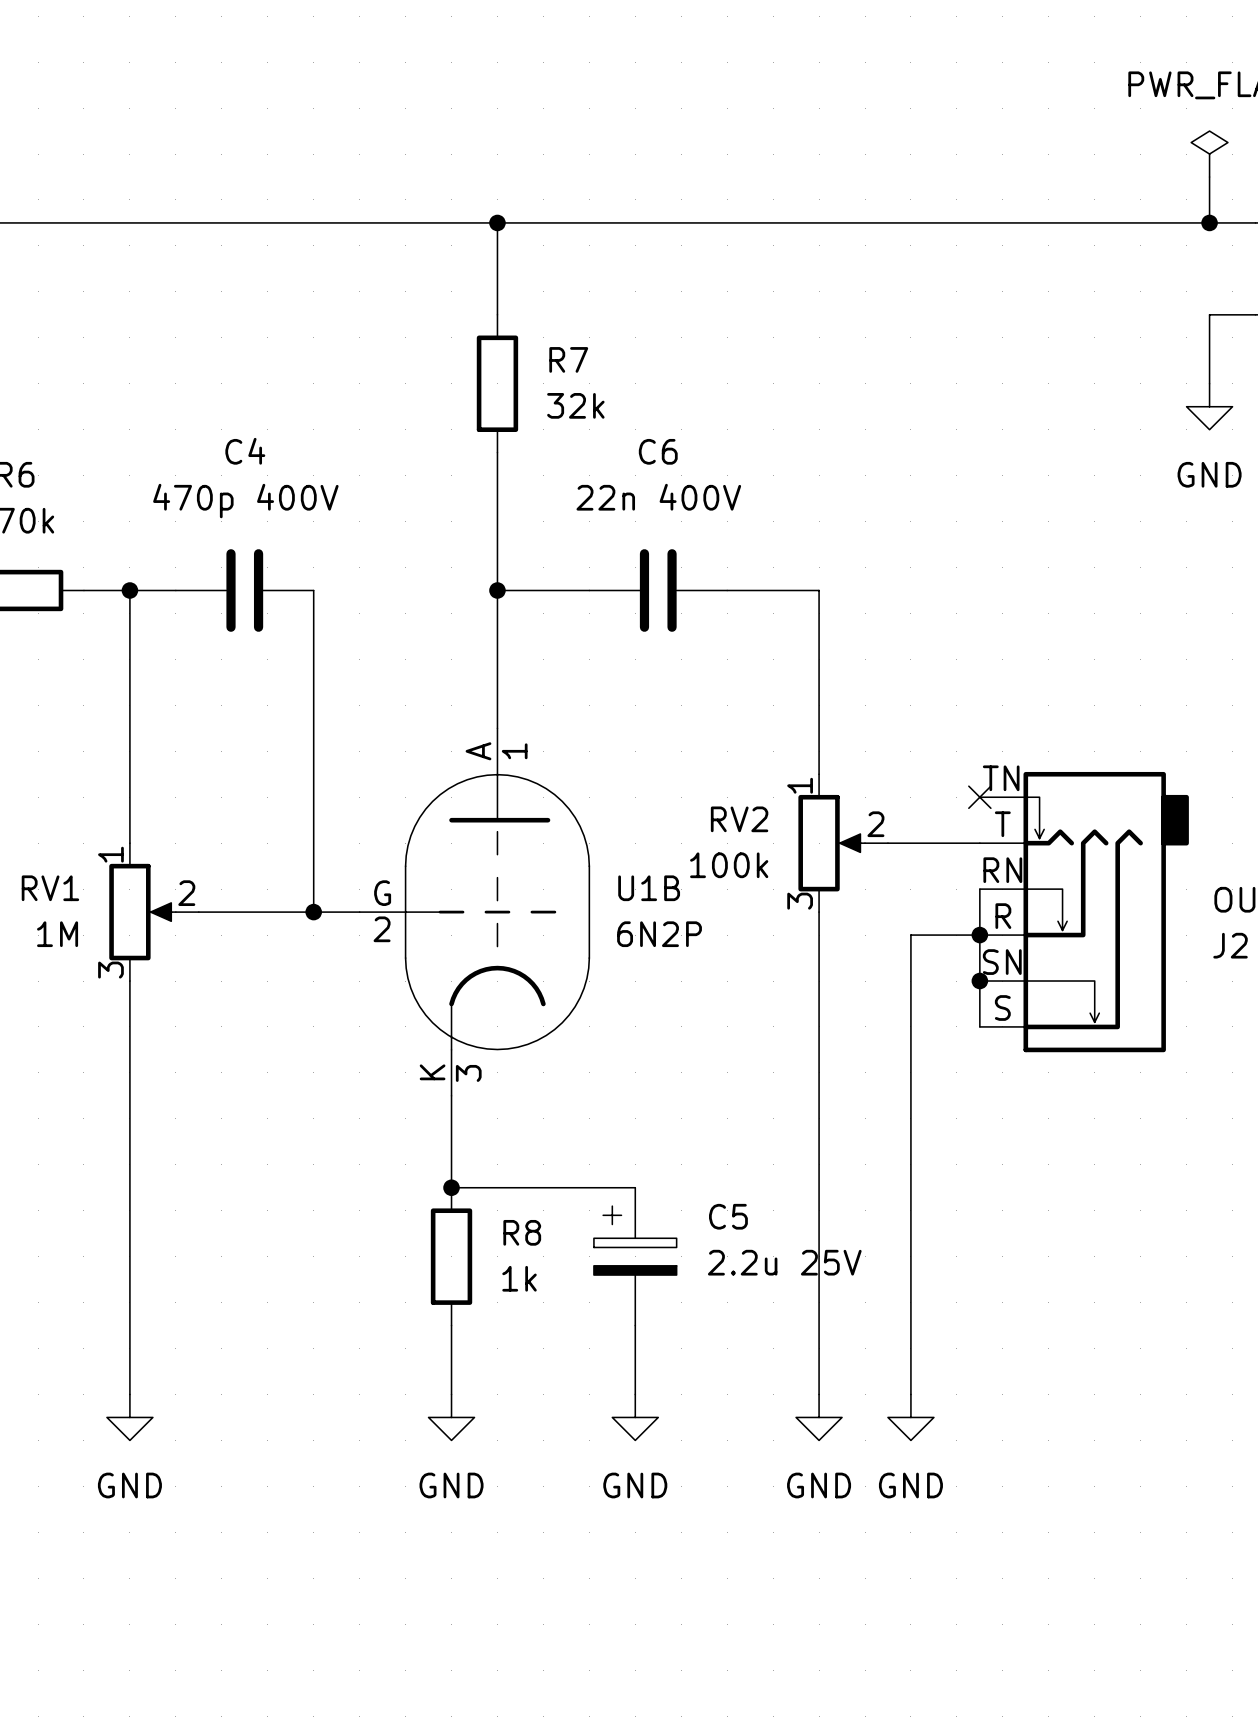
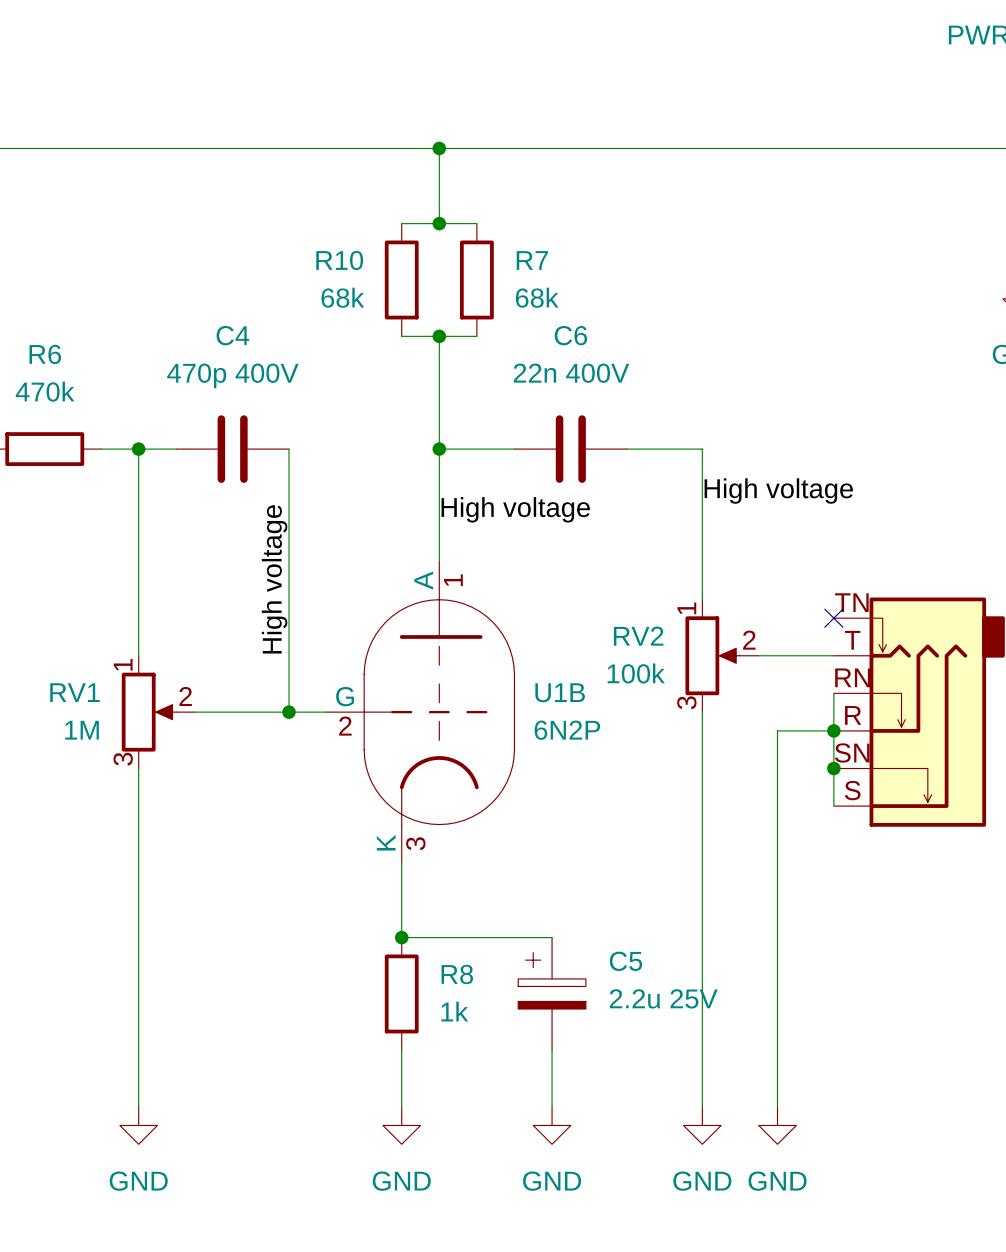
wire: none -> (401, 223) (476, 223)
junction: none -> (439, 223)
R10: none -> 68k (401, 279)
R7 position: (497, 383) -> (476, 279)
R7 value: 32k (575, 405) -> 68k (537, 297)
wire: none -> (401, 336) (476, 336)
junction: none -> (439, 336)
label: none -> High voltage (778, 491)
label: none -> High voltage (515, 509)
label: none -> High voltage (274, 579)

